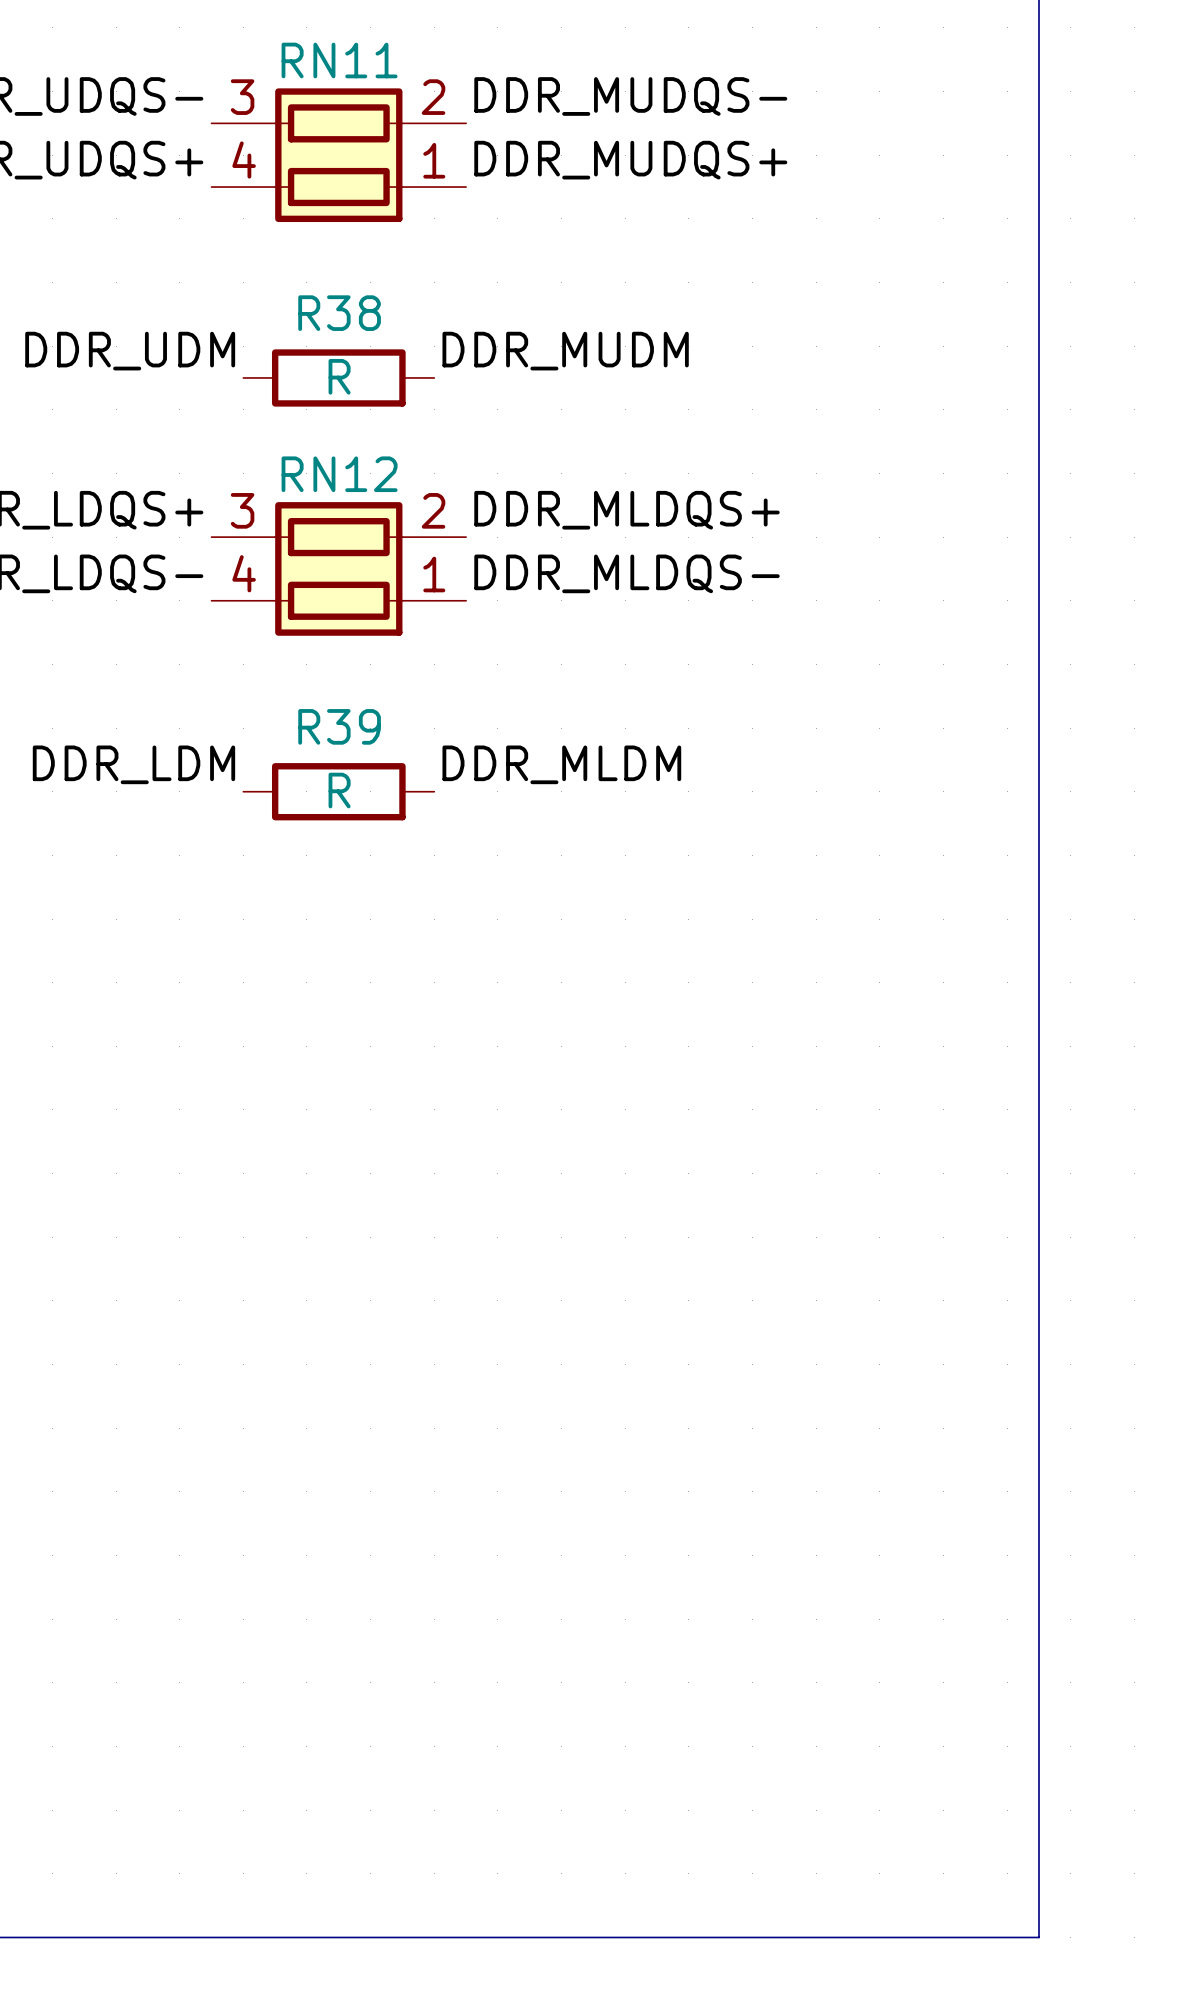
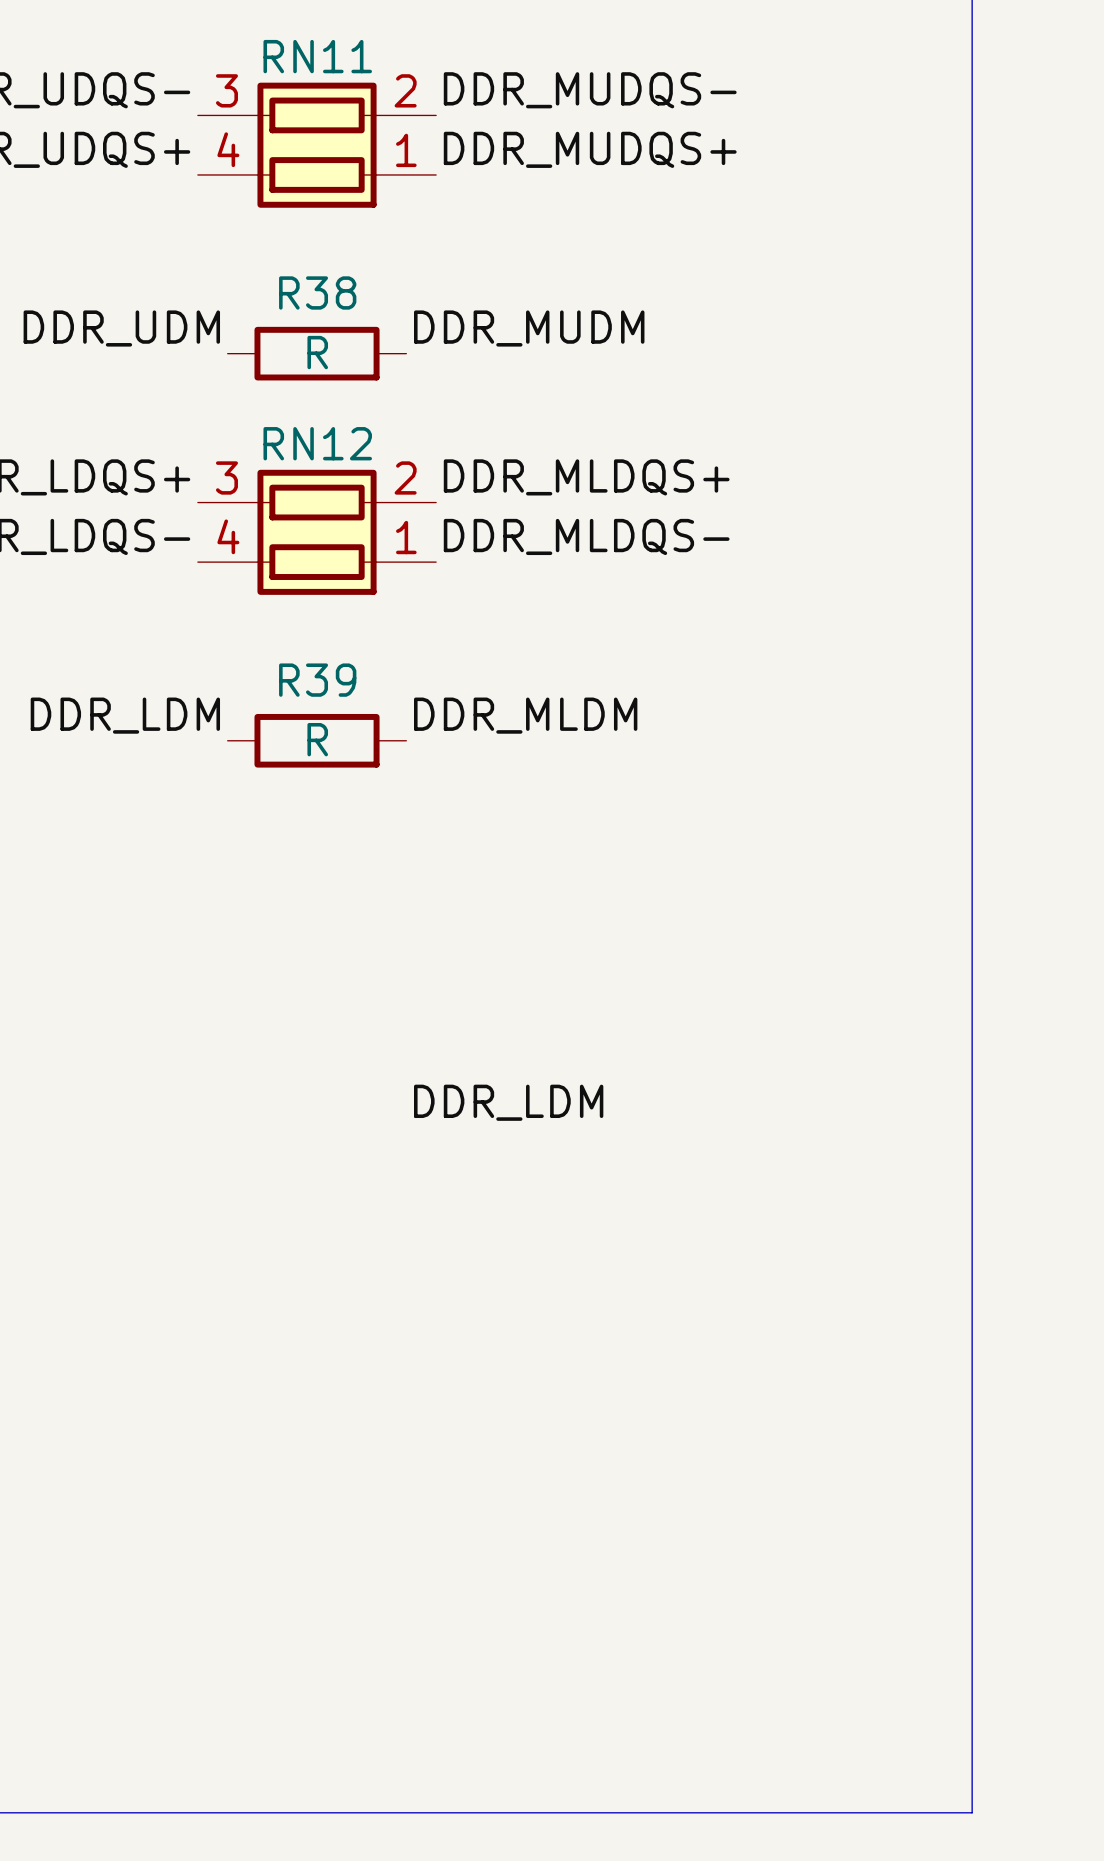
label: none -> DDR_LDM (508, 1102)

